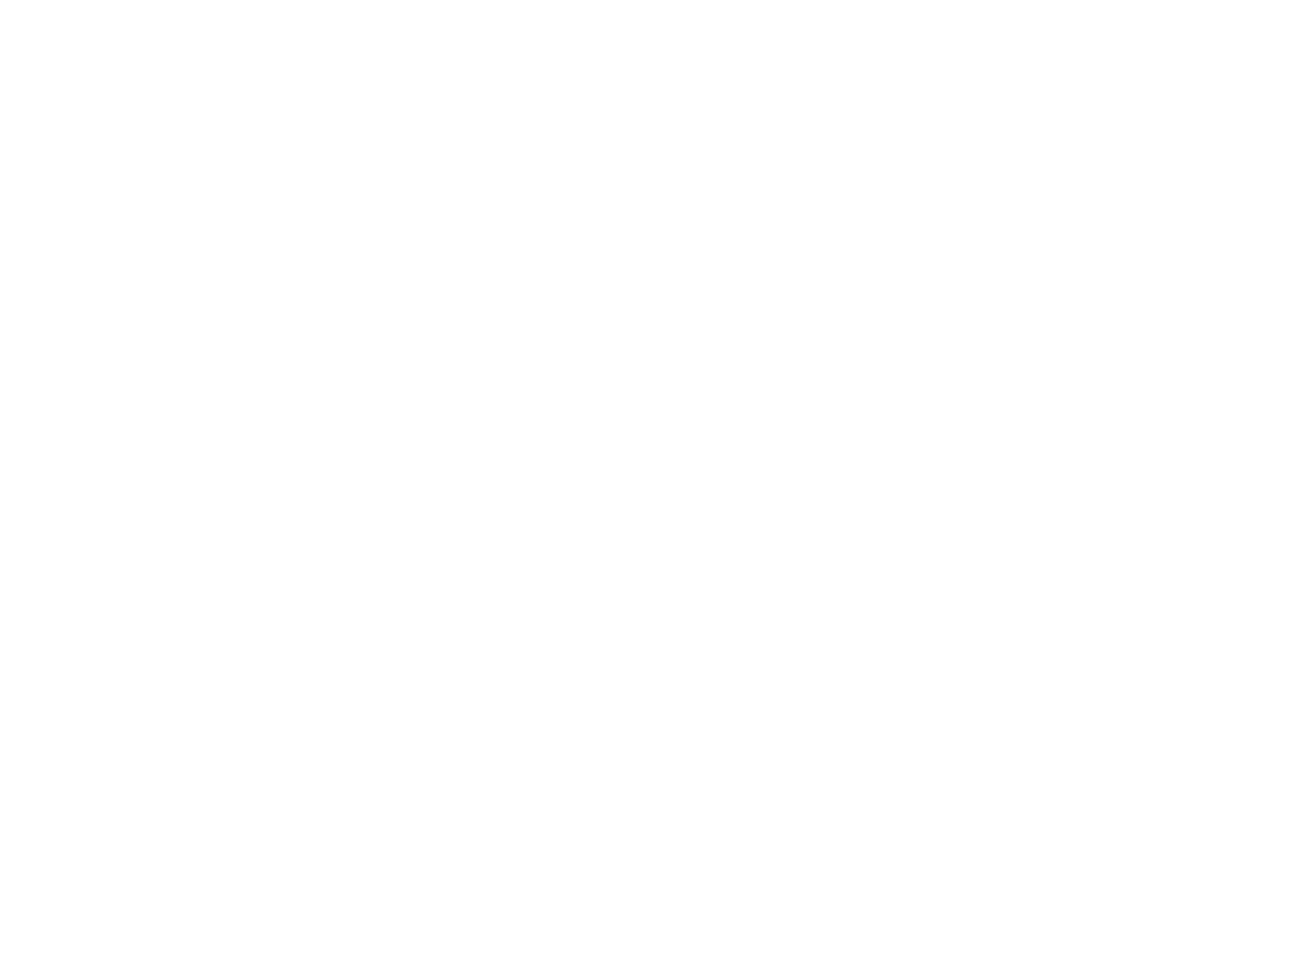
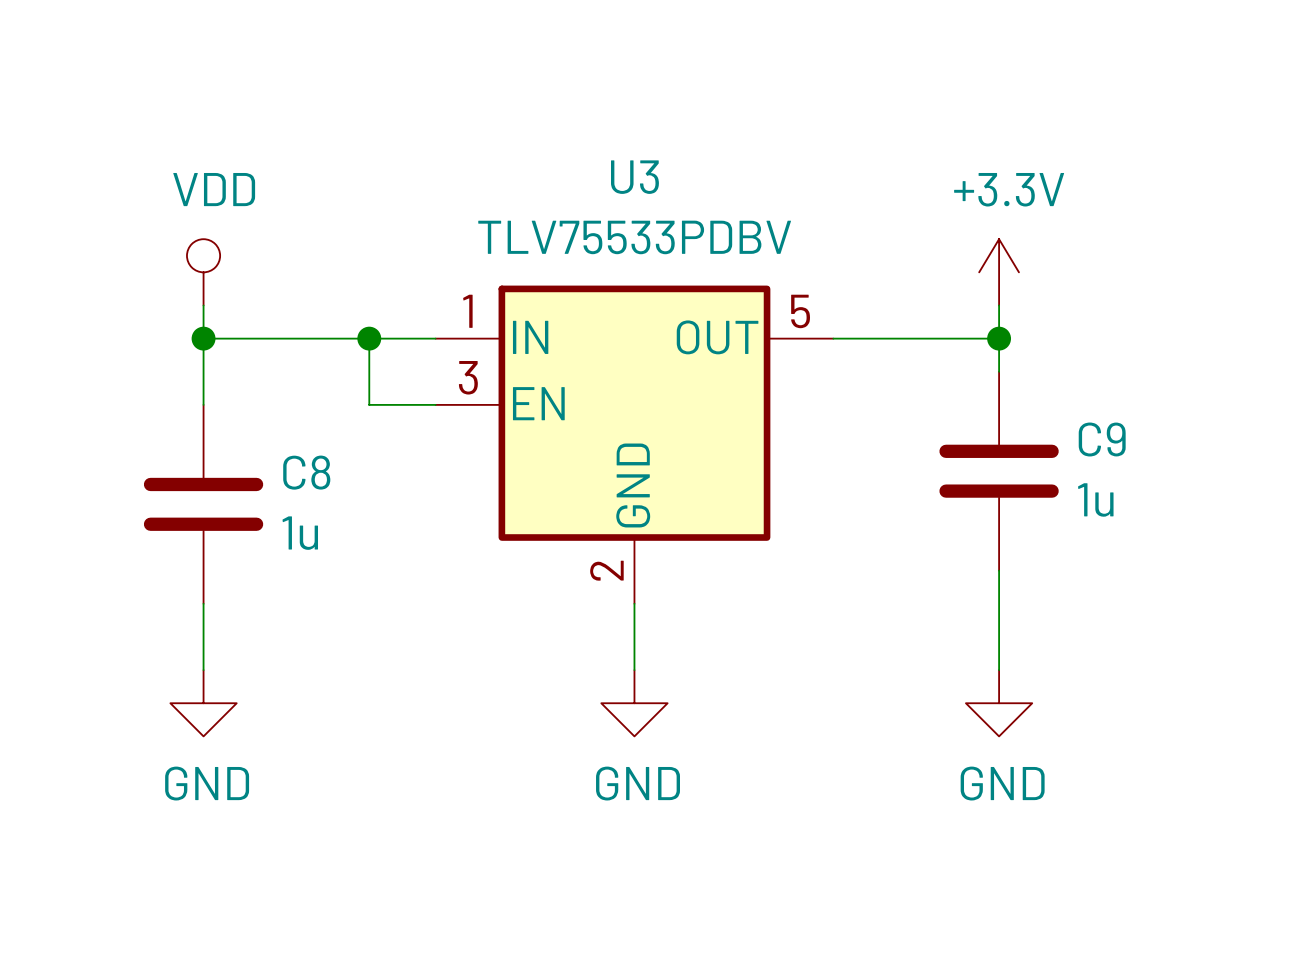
power symbol: none -> VDD (203, 272)
power symbol: none -> +3.3V (999, 272)
wire: none -> (203, 305) (203, 404)
wire: none -> (999, 305) (999, 371)
wire: none -> (203, 338) (435, 338)
junction: none -> (203, 338)
wire: none -> (369, 338) (369, 404) (435, 404)
junction: none -> (369, 338)
wire: none -> (833, 338) (999, 338)
junction: none -> (999, 338)
U3: none -> TLV75533PDBV (634, 444)
C9: none -> 1u (999, 471)
C8: none -> 1u (203, 504)
wire: none -> (999, 570) (999, 670)
wire: none -> (203, 603) (203, 670)
wire: none -> (634, 603) (634, 670)
power symbol: none -> GND (203, 703)
power symbol: none -> GND (634, 703)
power symbol: none -> GND (999, 703)

